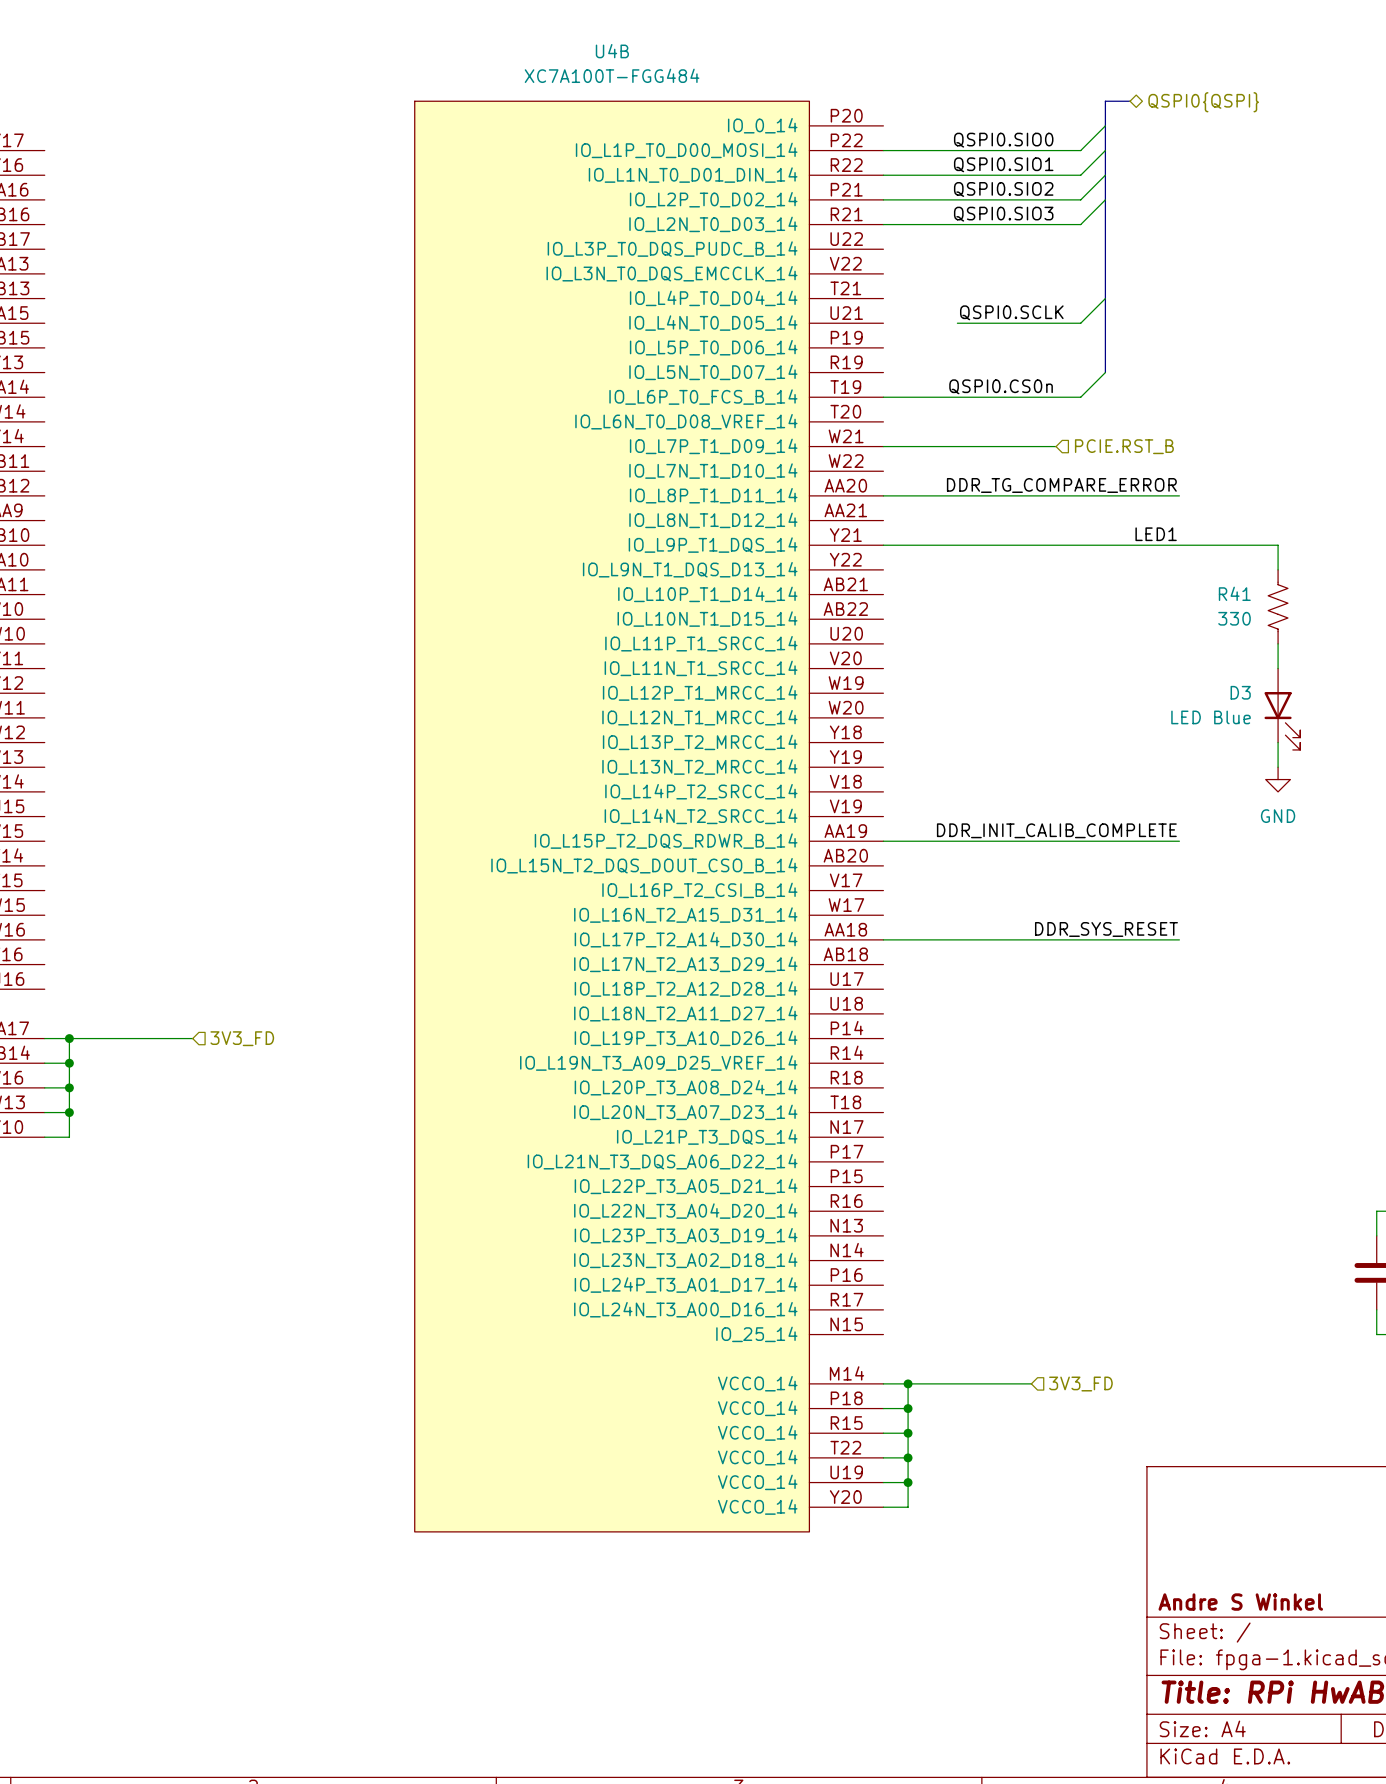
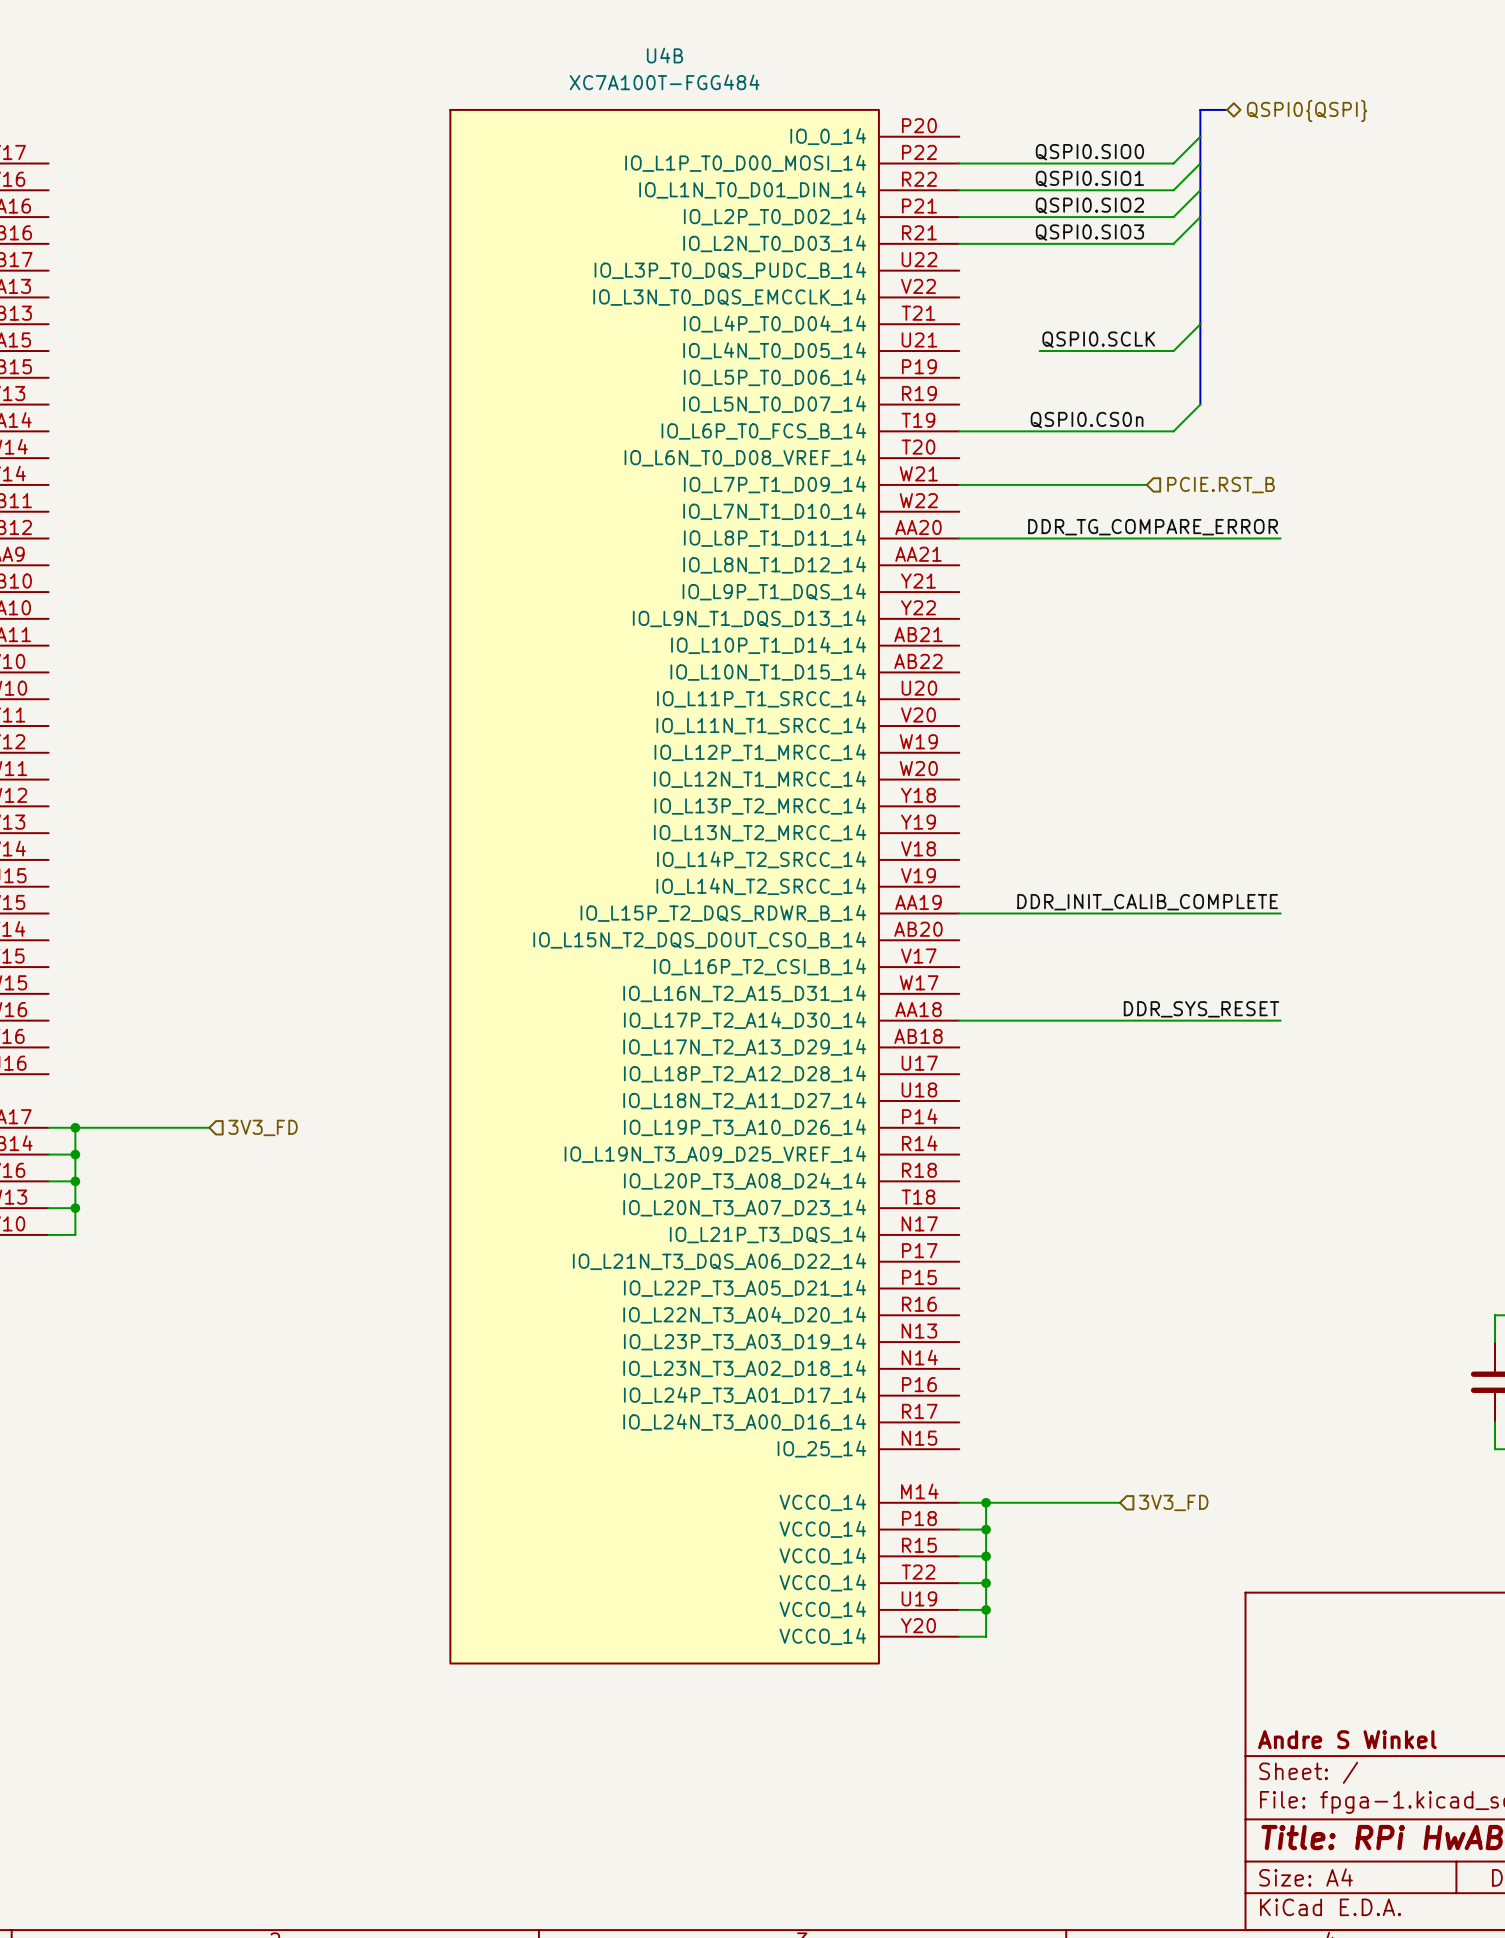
label: LED1 (1156, 534) -> none
wire: (883, 545) (1278, 545) (1278, 569) -> none
R41: 330 (1278, 606) -> none
wire: (1278, 643) (1278, 668) -> none
D3: LED Blue (1282, 709) -> none
wire: (1278, 742) (1278, 767) -> none
power symbol: GND (1278, 779) -> none

